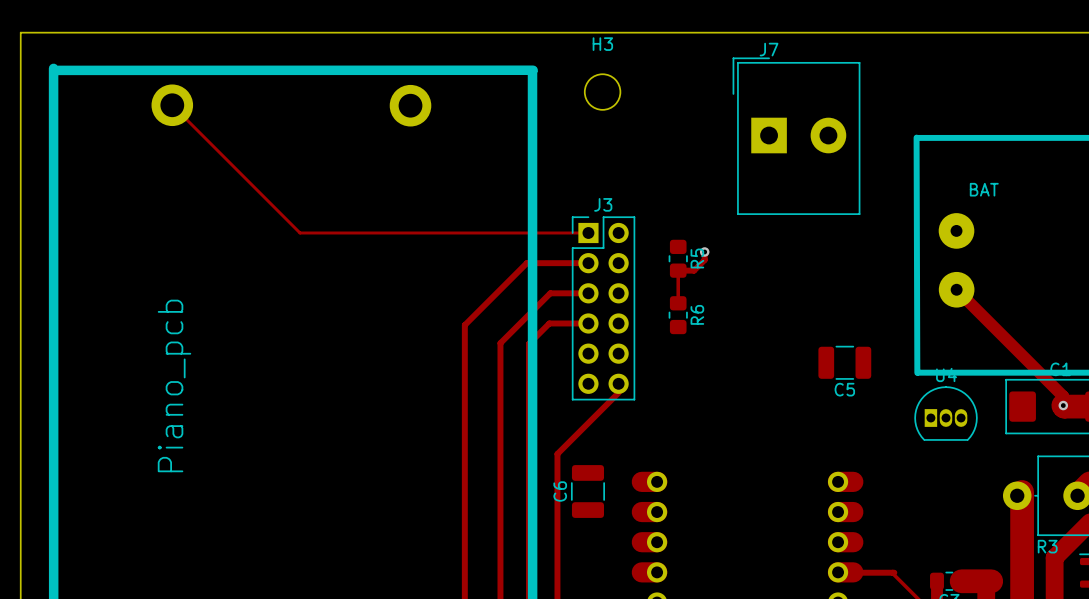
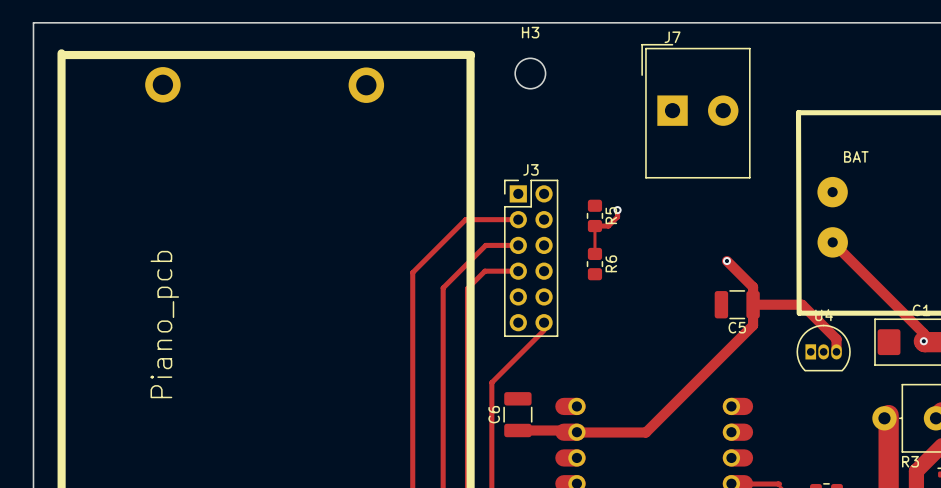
track: (172, 105) (300, 232) (588, 232) -> none
track: none -> (727, 261) (753, 287) (753, 325) (645, 432) (517, 430)
via: none -> (727, 261)
track: none -> (753, 304) (802, 304) (836, 339) (836, 353)

